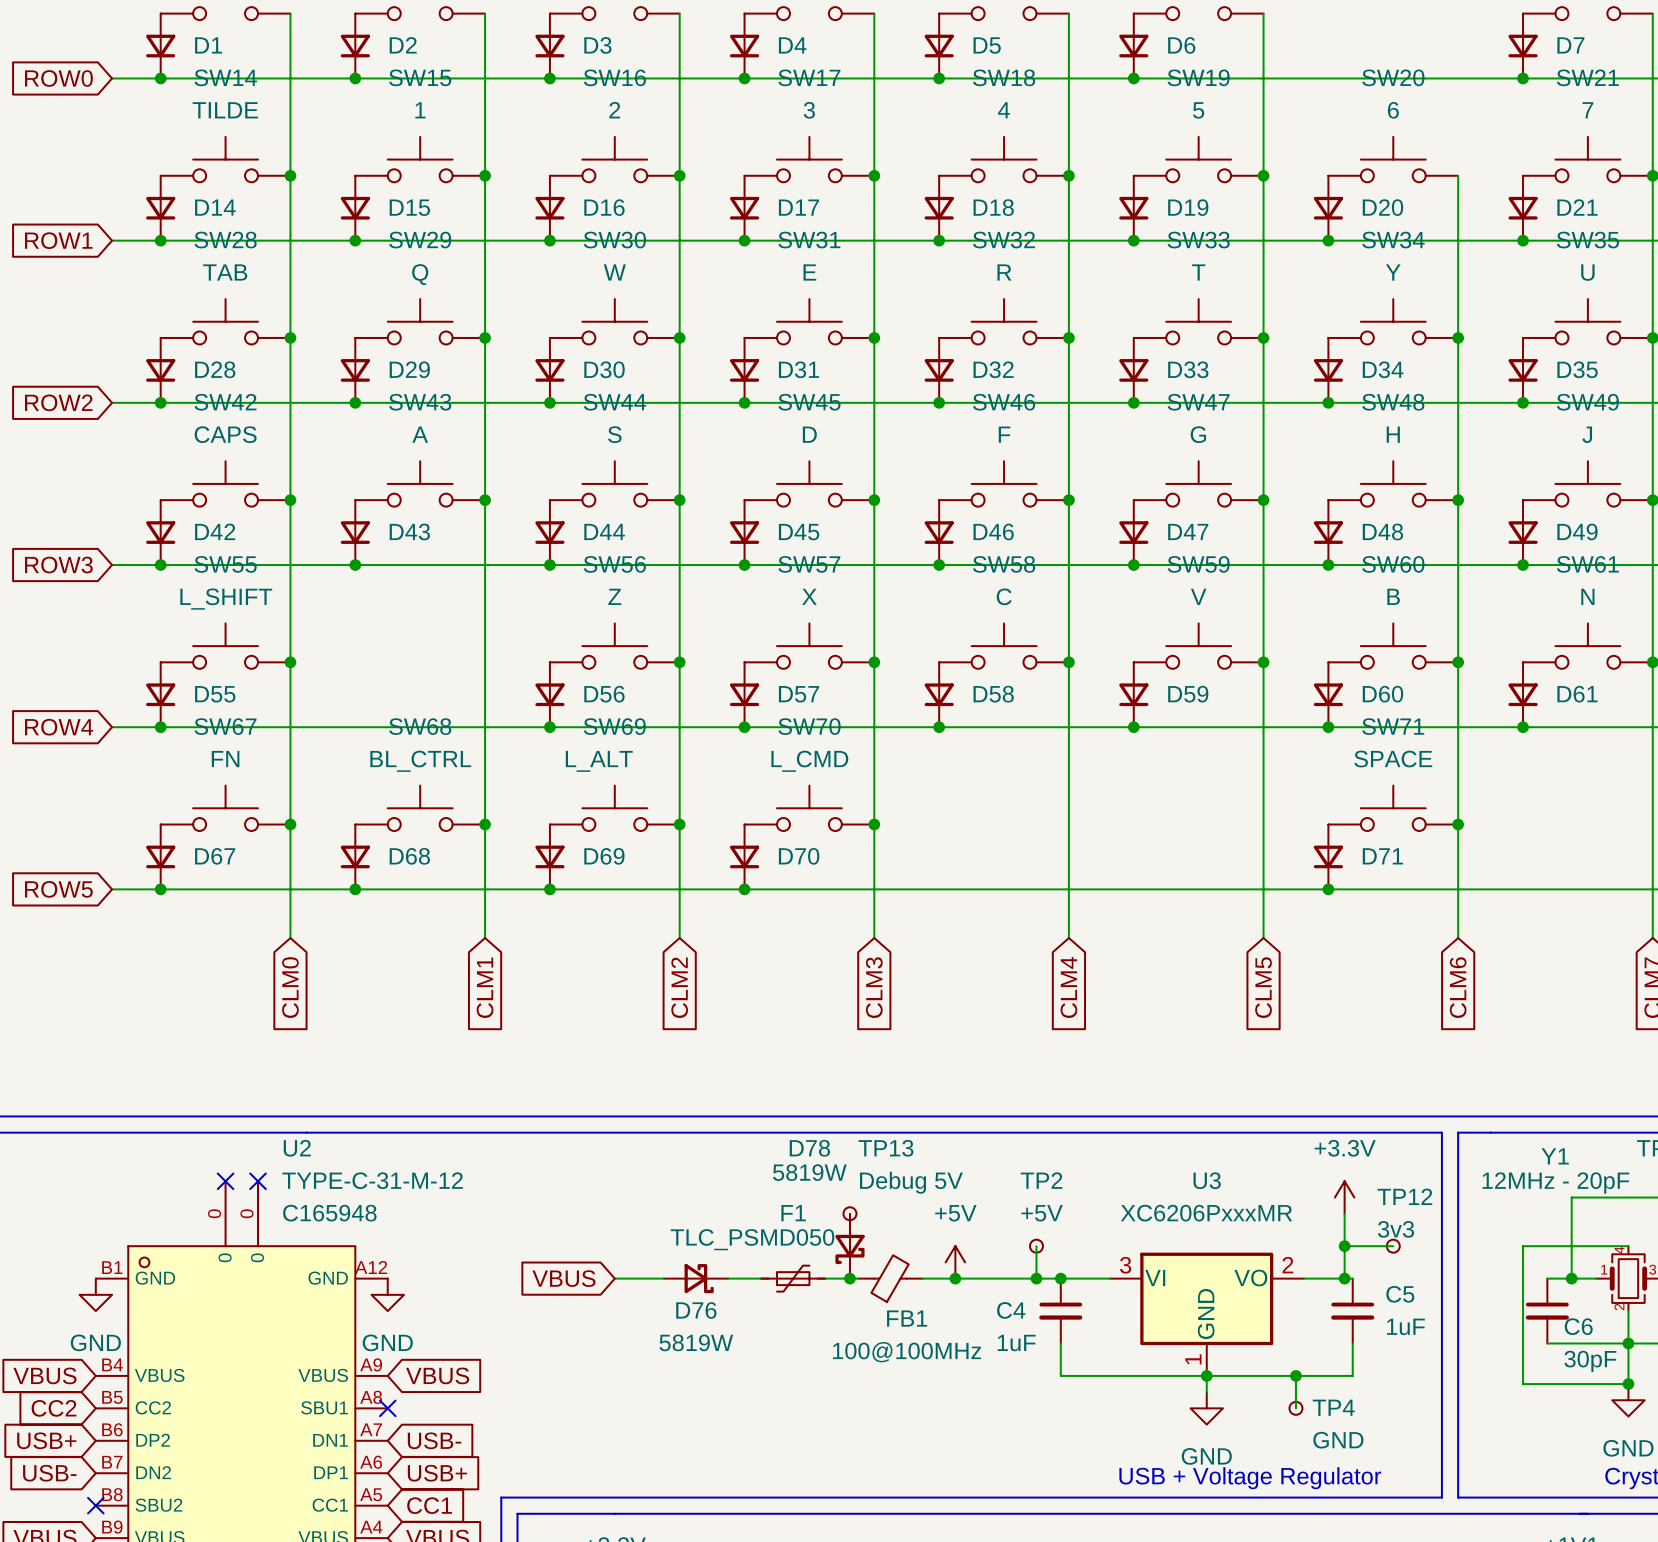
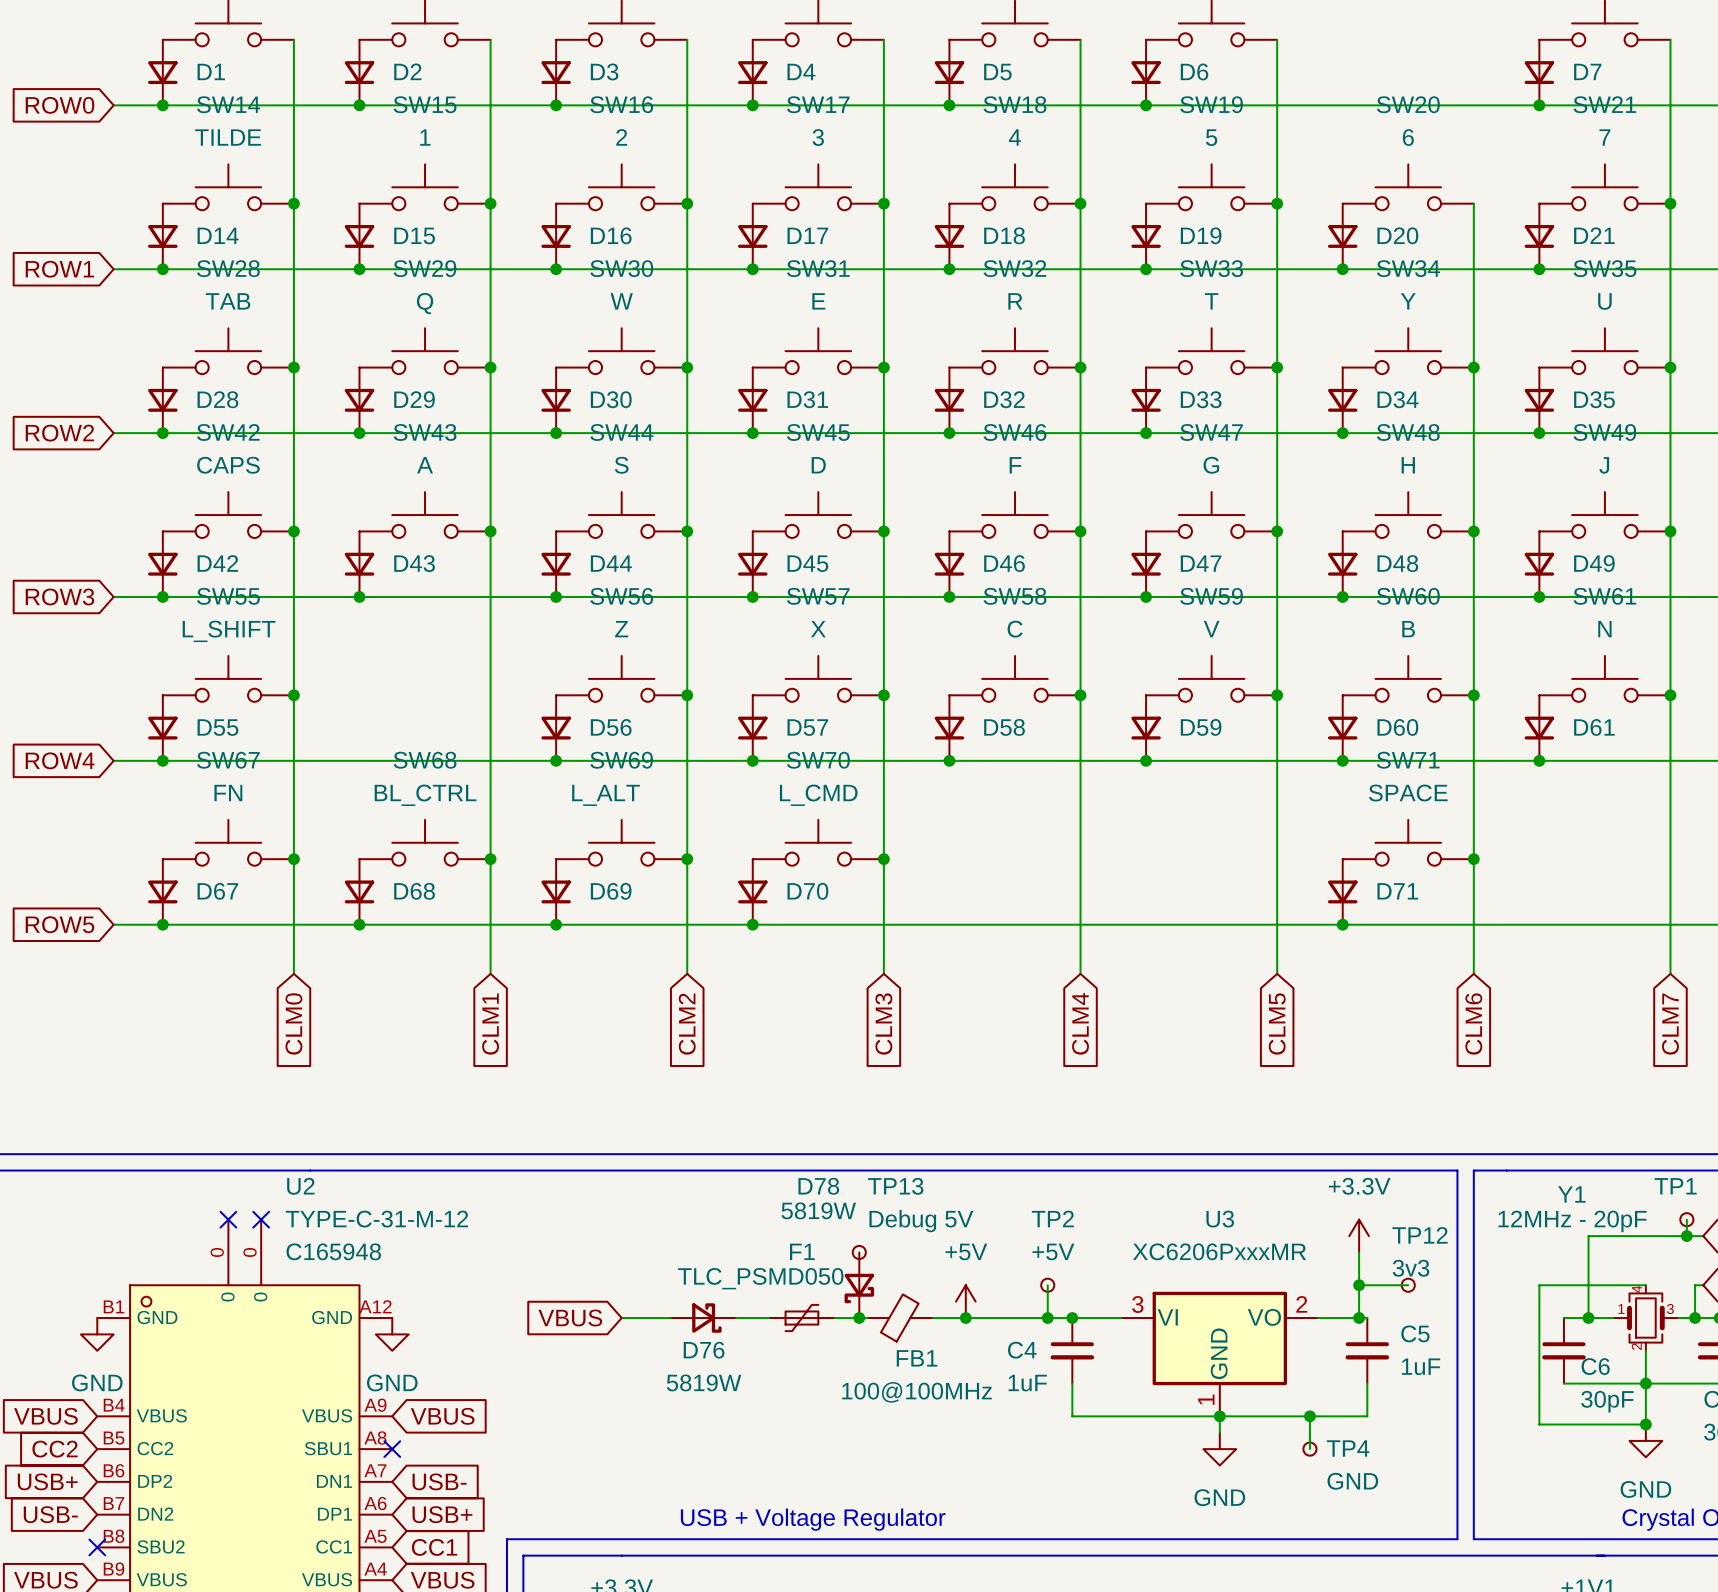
text: none -> USB + Voltage Regulator (813, 1519)
text: USB + Voltage Regulator (1250, 1478) -> none

